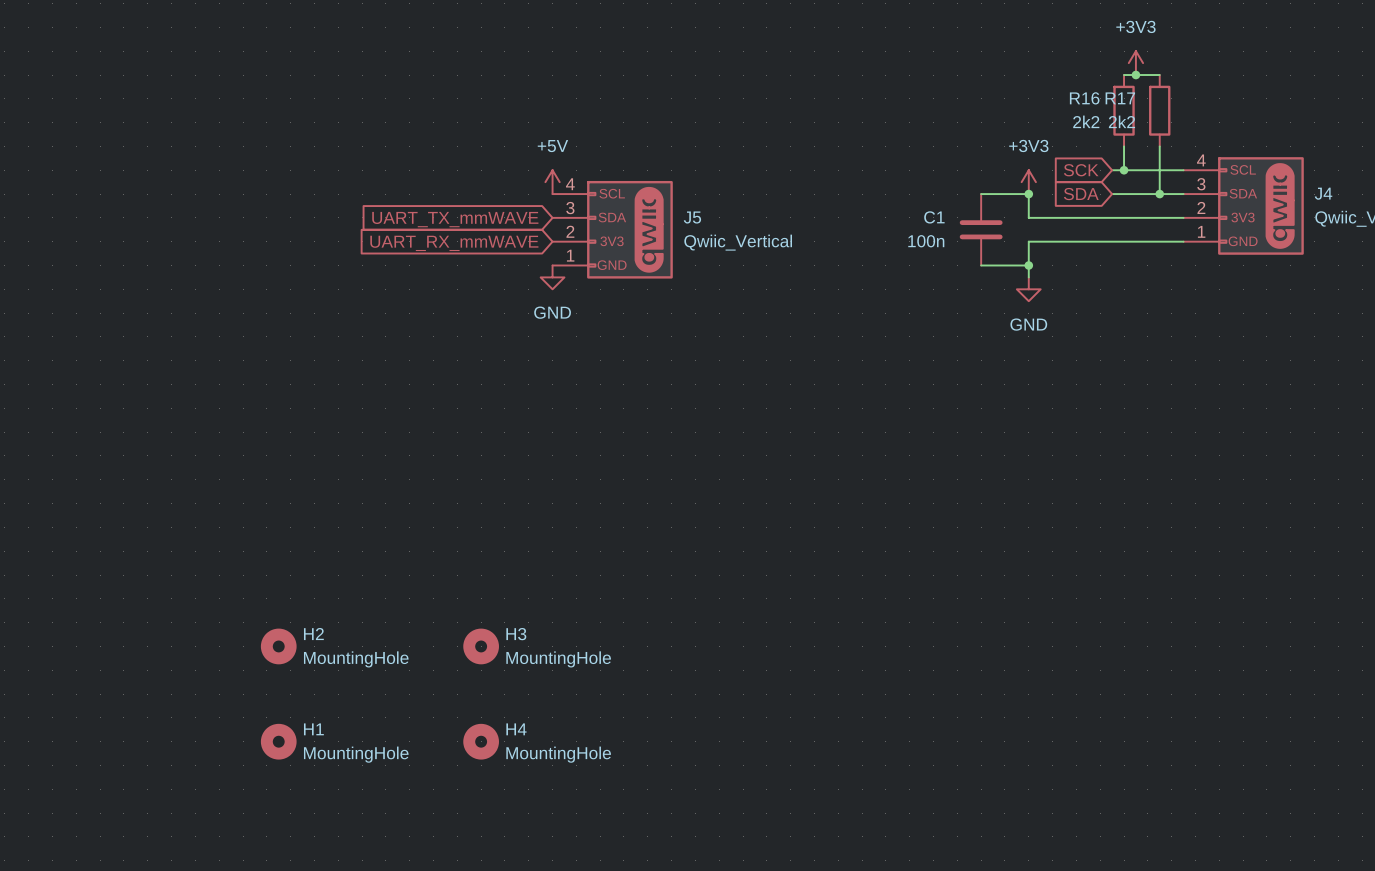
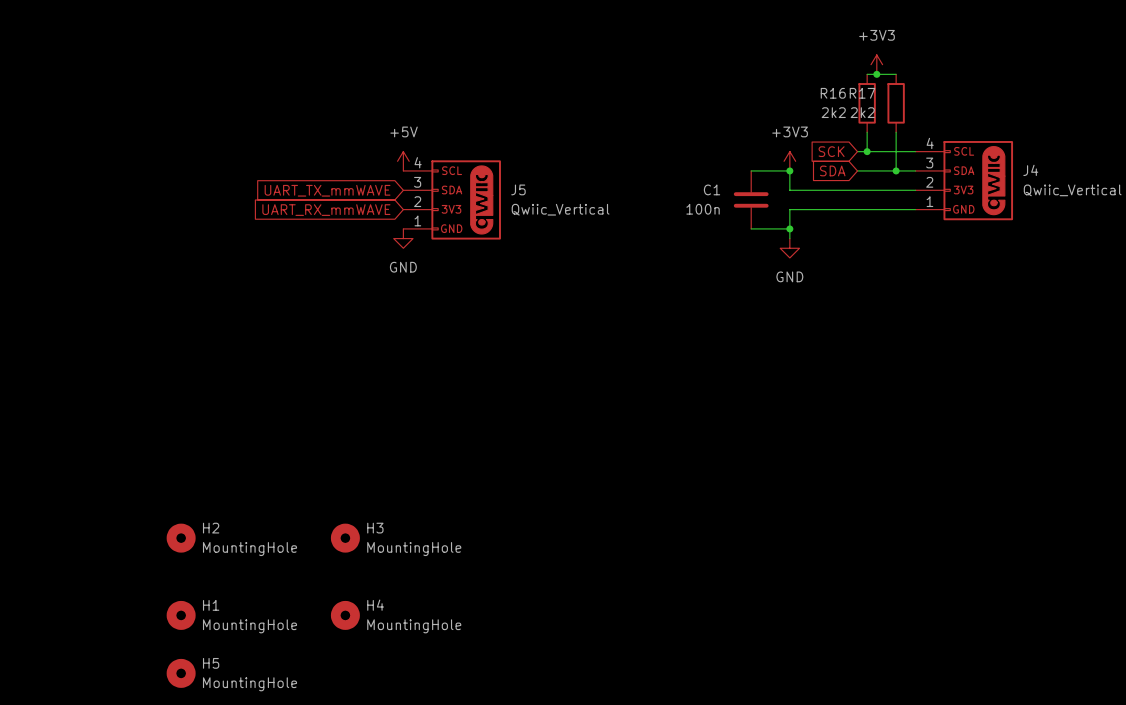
H5: none -> MountingHole (181, 673)

